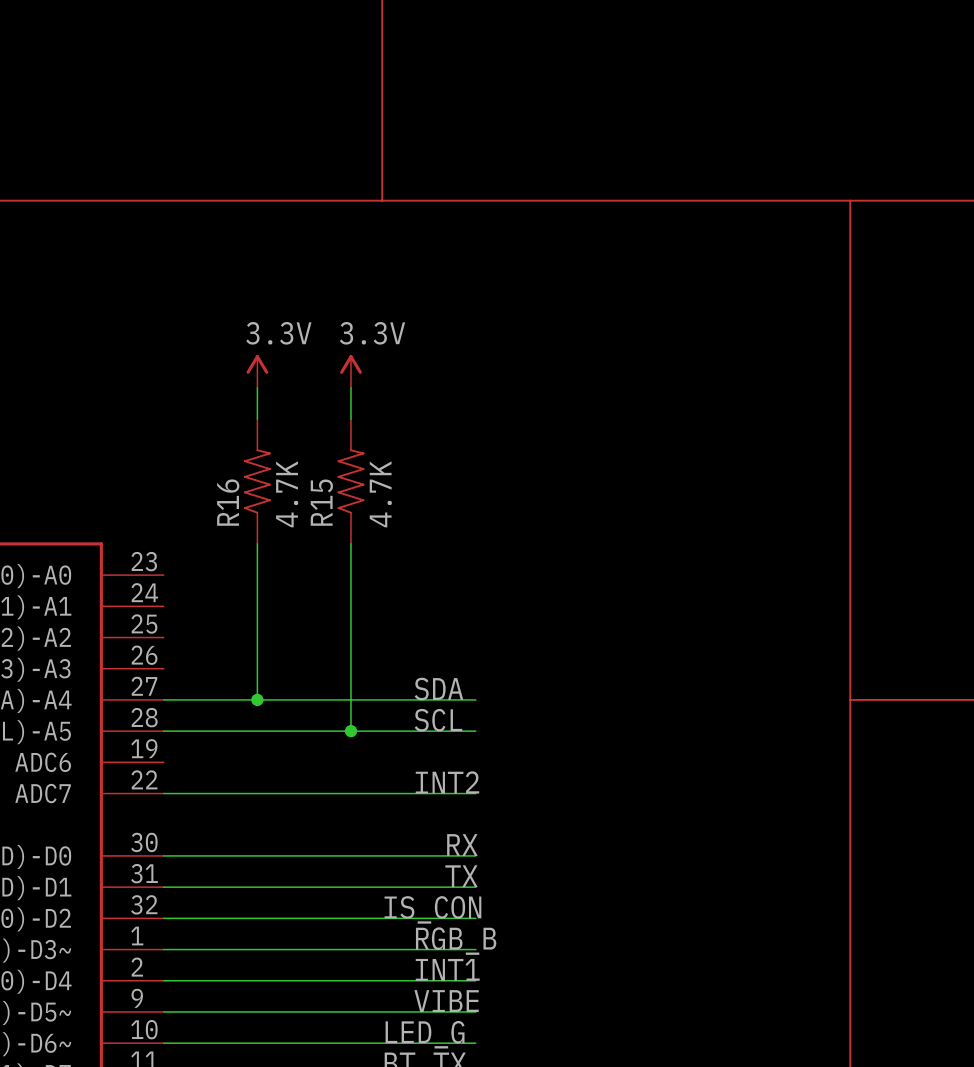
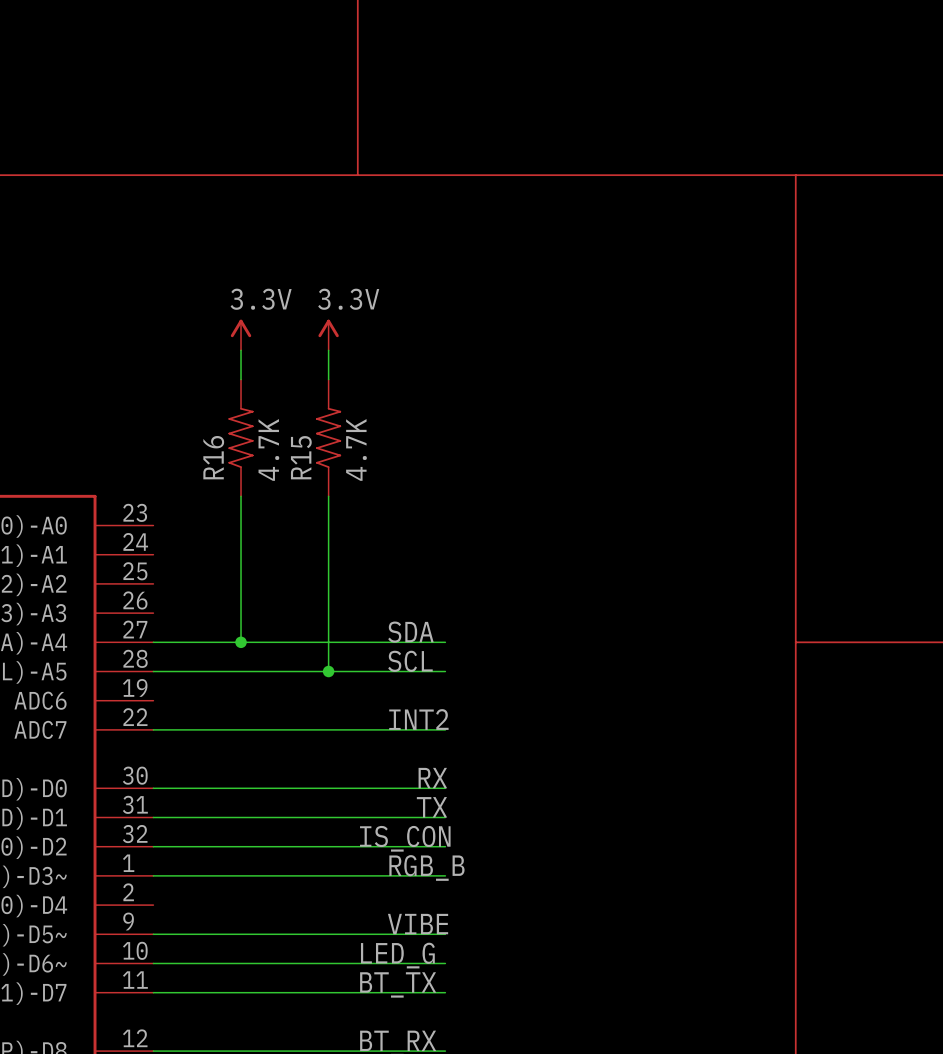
label: INT1 (447, 969) -> none
wire: (163, 980) (475, 980) -> none

